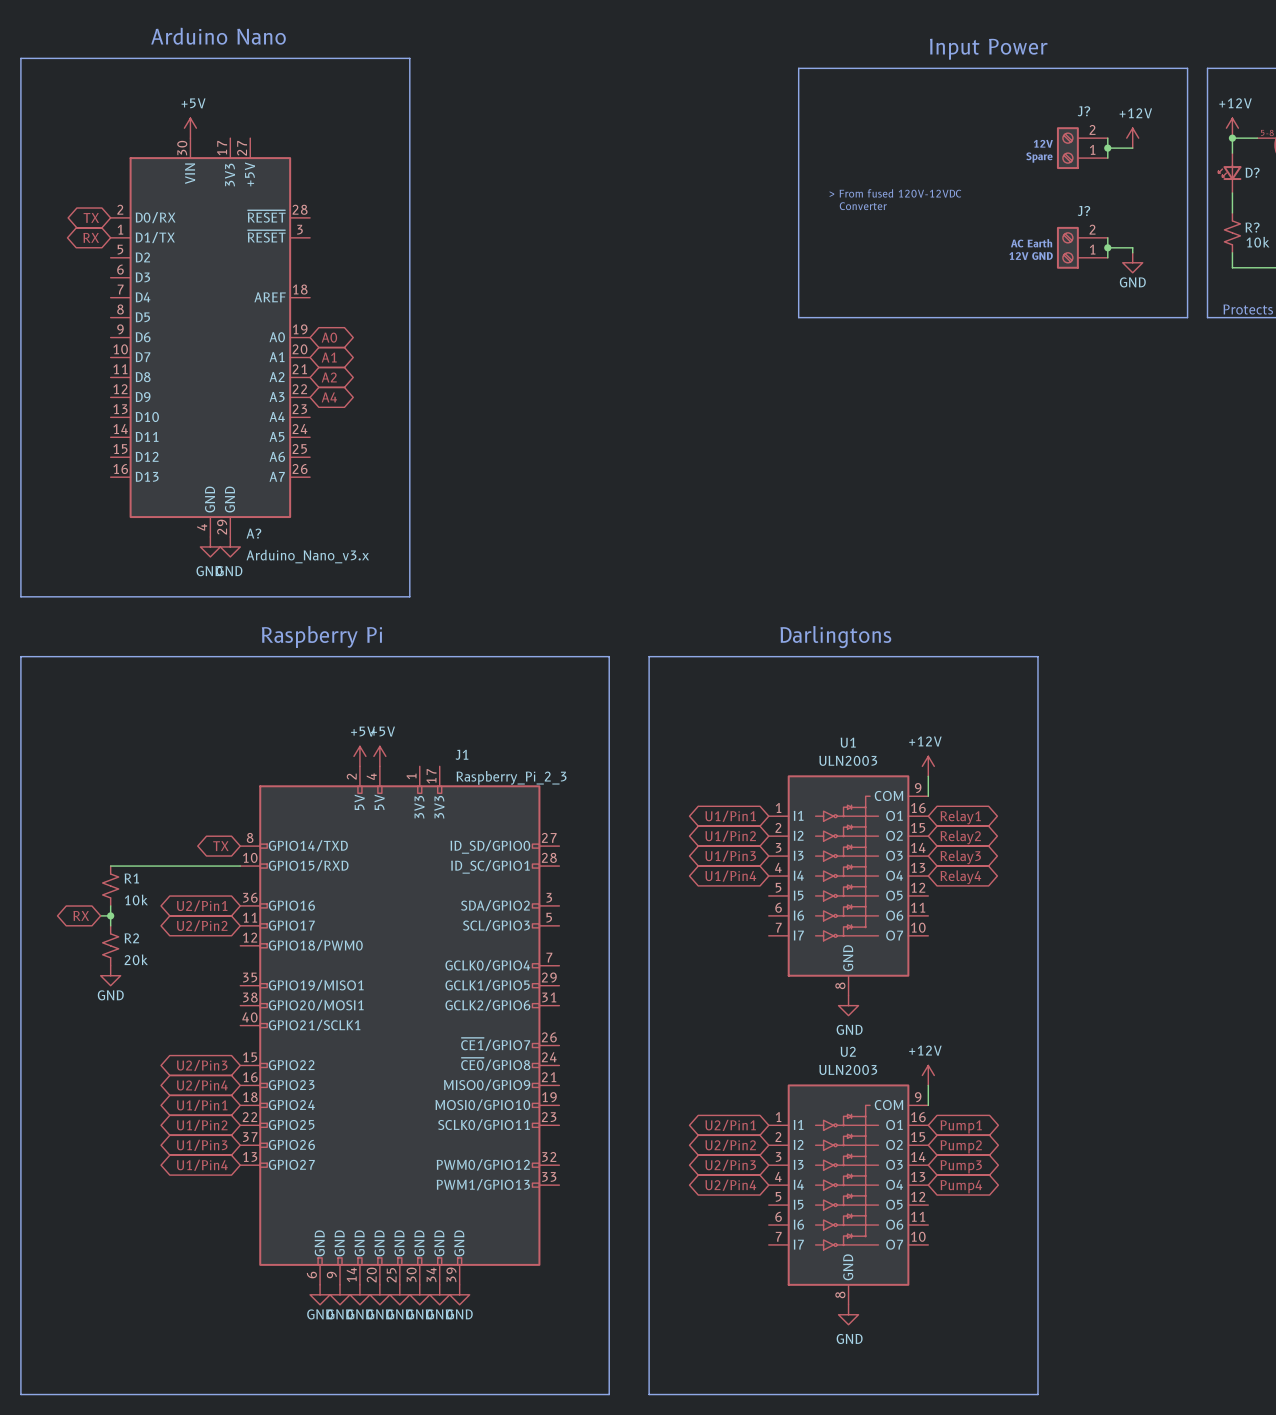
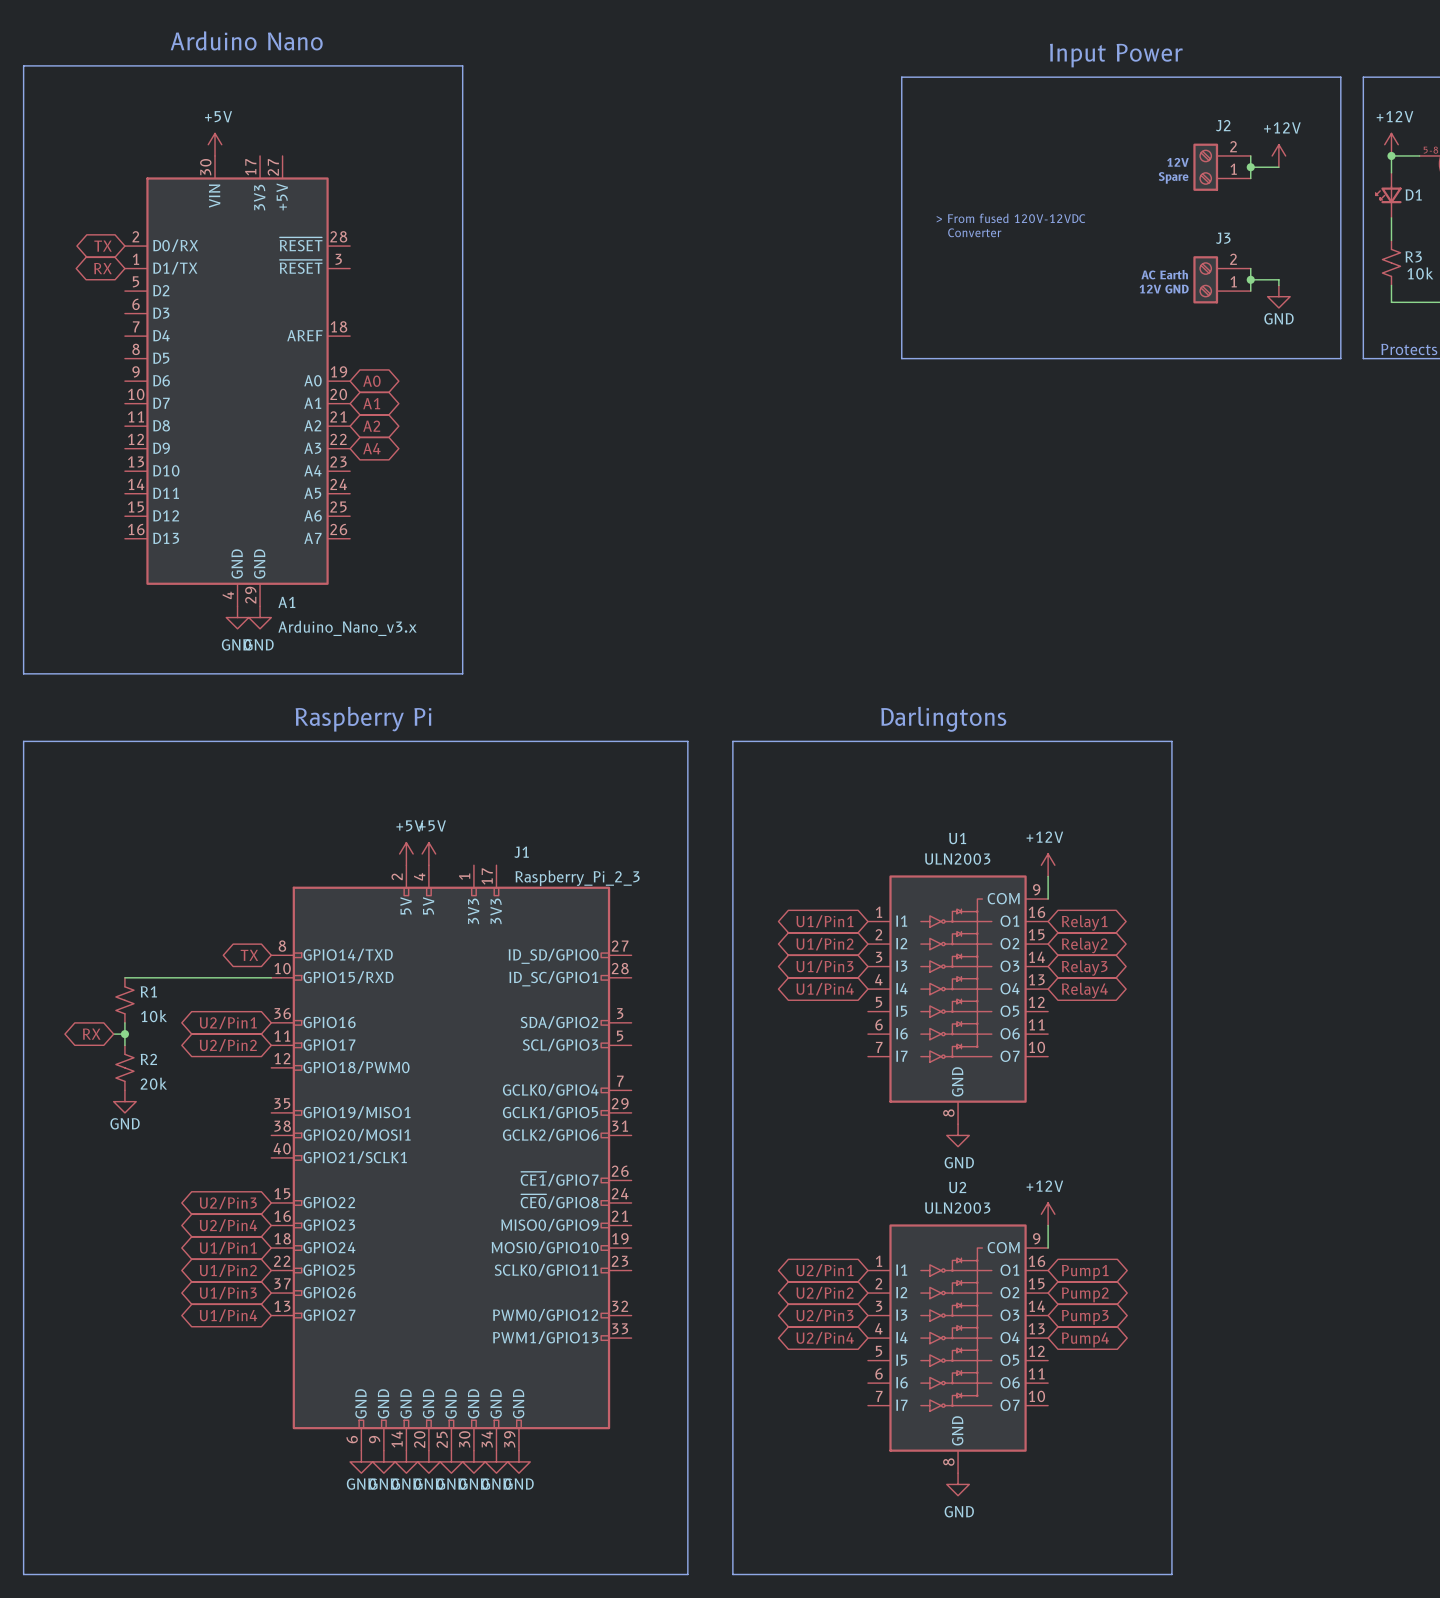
J? name: J? (1083, 111) -> J2 (1223, 125)
D? name: D? (1252, 172) -> D1 (1413, 194)
J? name: J? (1083, 211) -> J3 (1223, 238)
R? name: R? (1252, 227) -> R3 (1413, 256)
A? name: A? (253, 533) -> A1 (286, 602)

